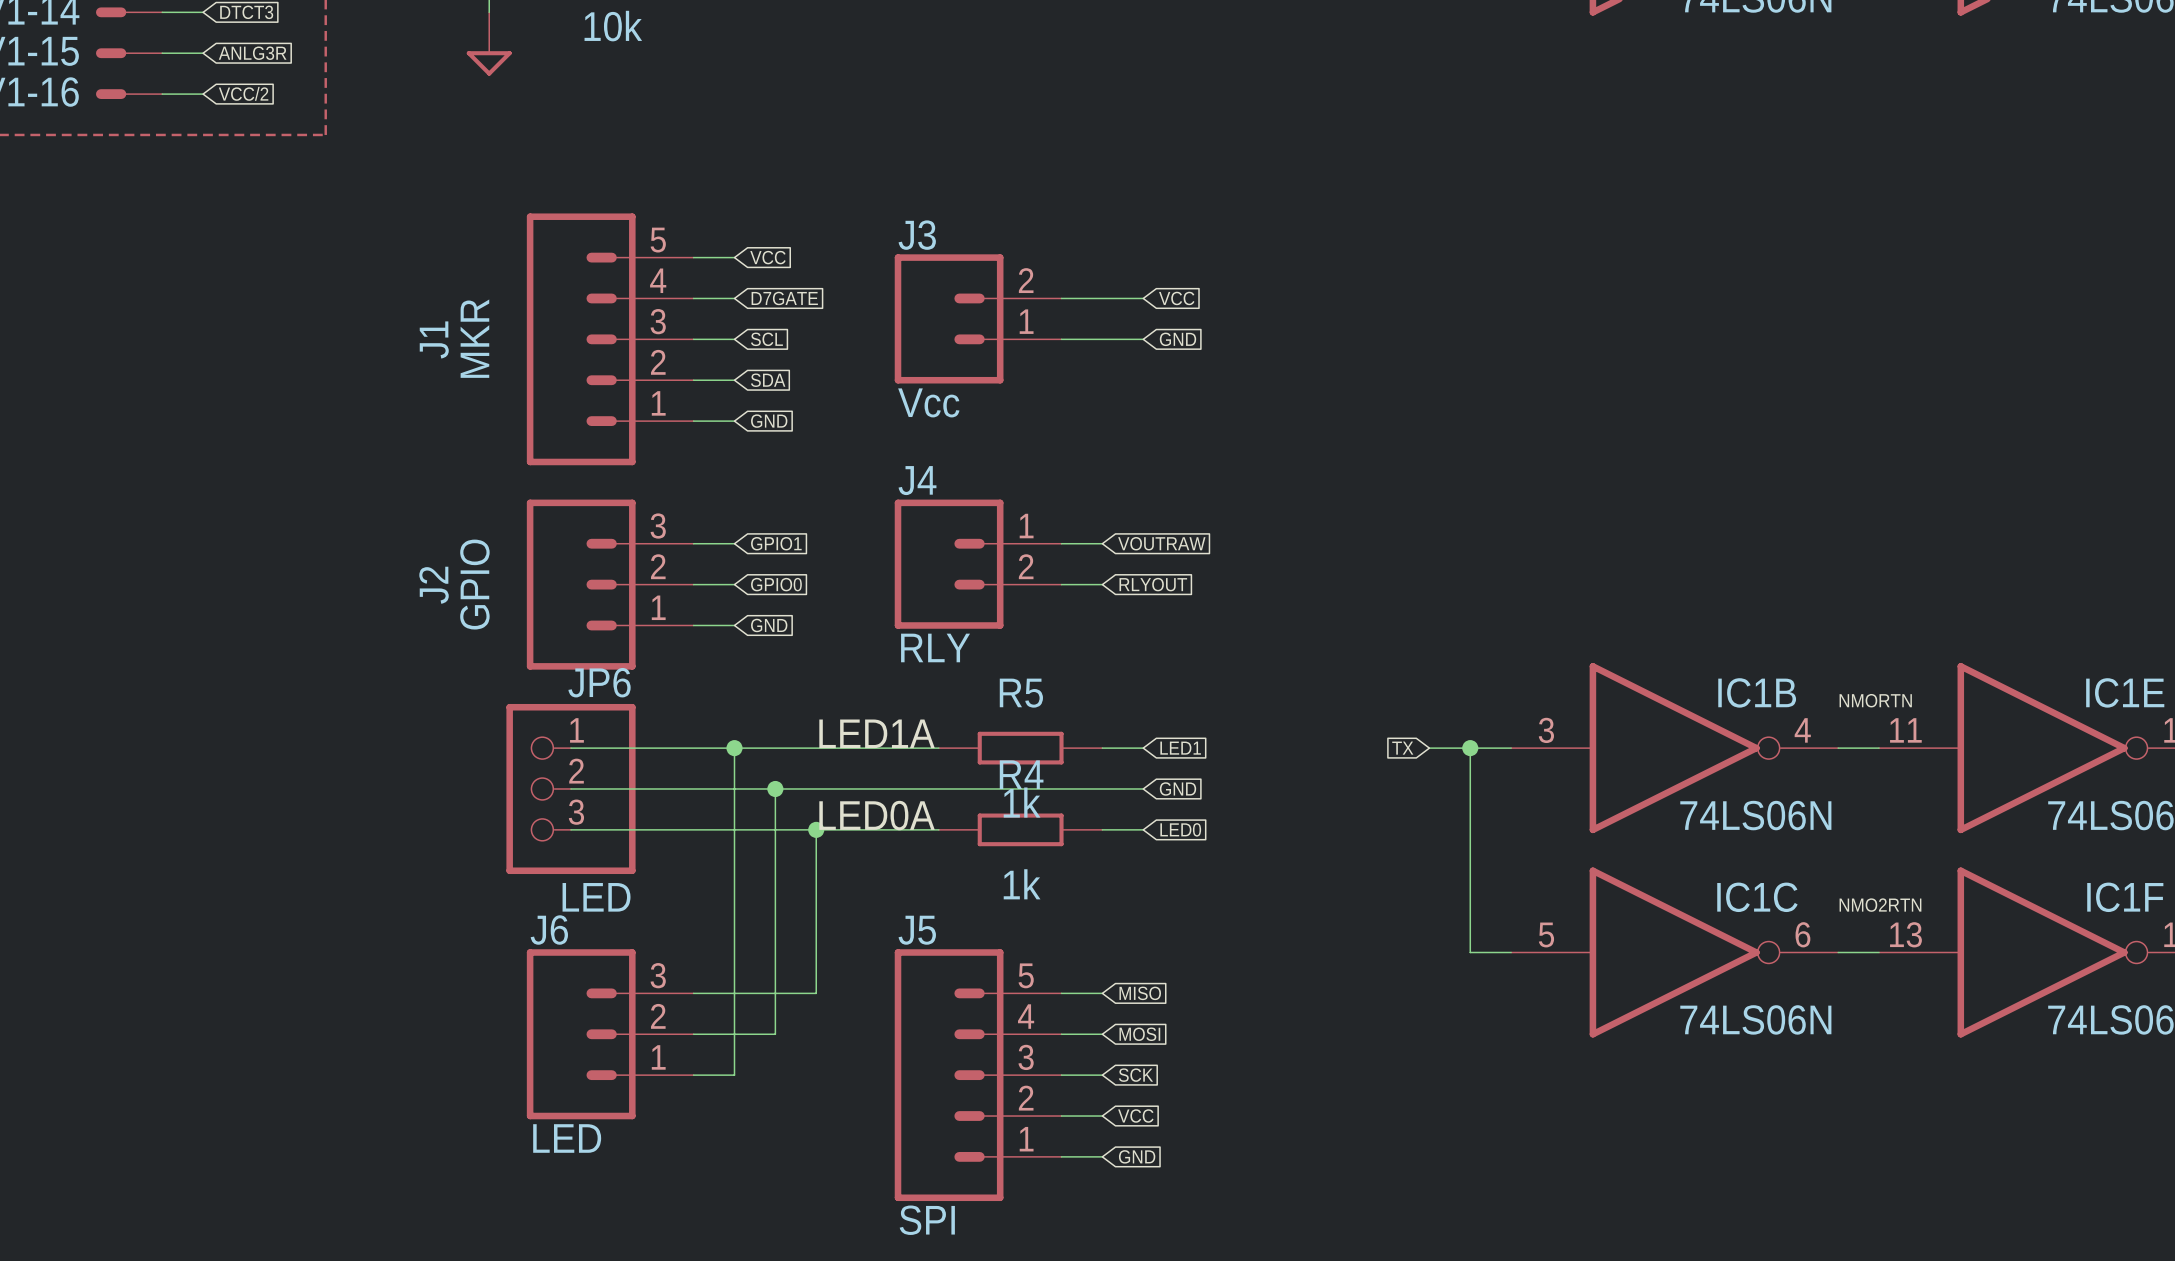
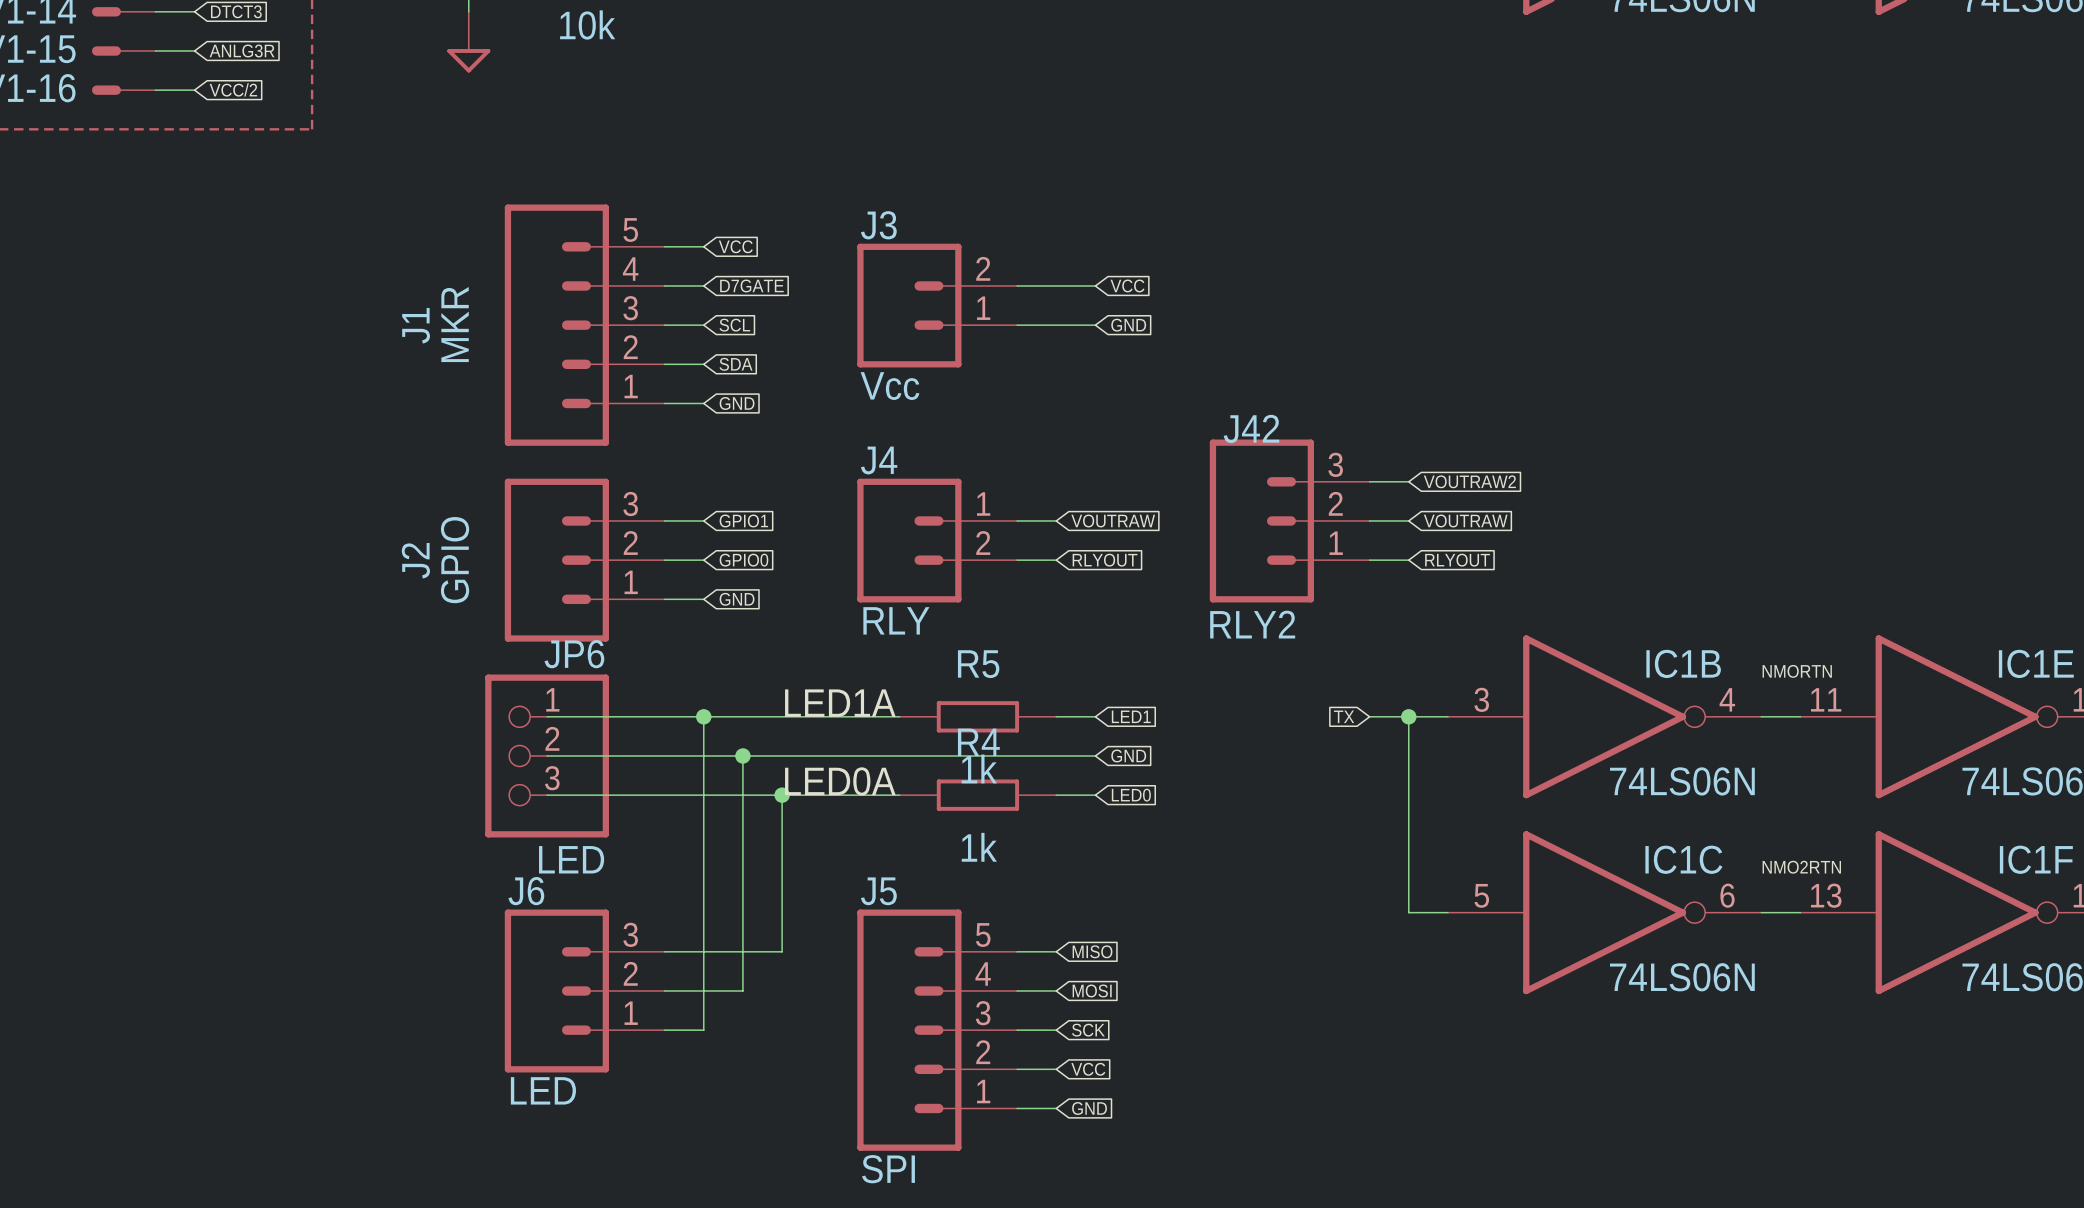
wire: none -> (1369, 481) (1408, 481)
global label: none -> VOUTRAW2 (1469, 481)
J42: none -> RLY2 (1289, 520)
wire: none -> (1369, 520) (1408, 520)
global label: none -> VOUTRAW (1465, 520)
wire: none -> (1369, 560) (1408, 560)
global label: none -> RLYOUT (1457, 560)

